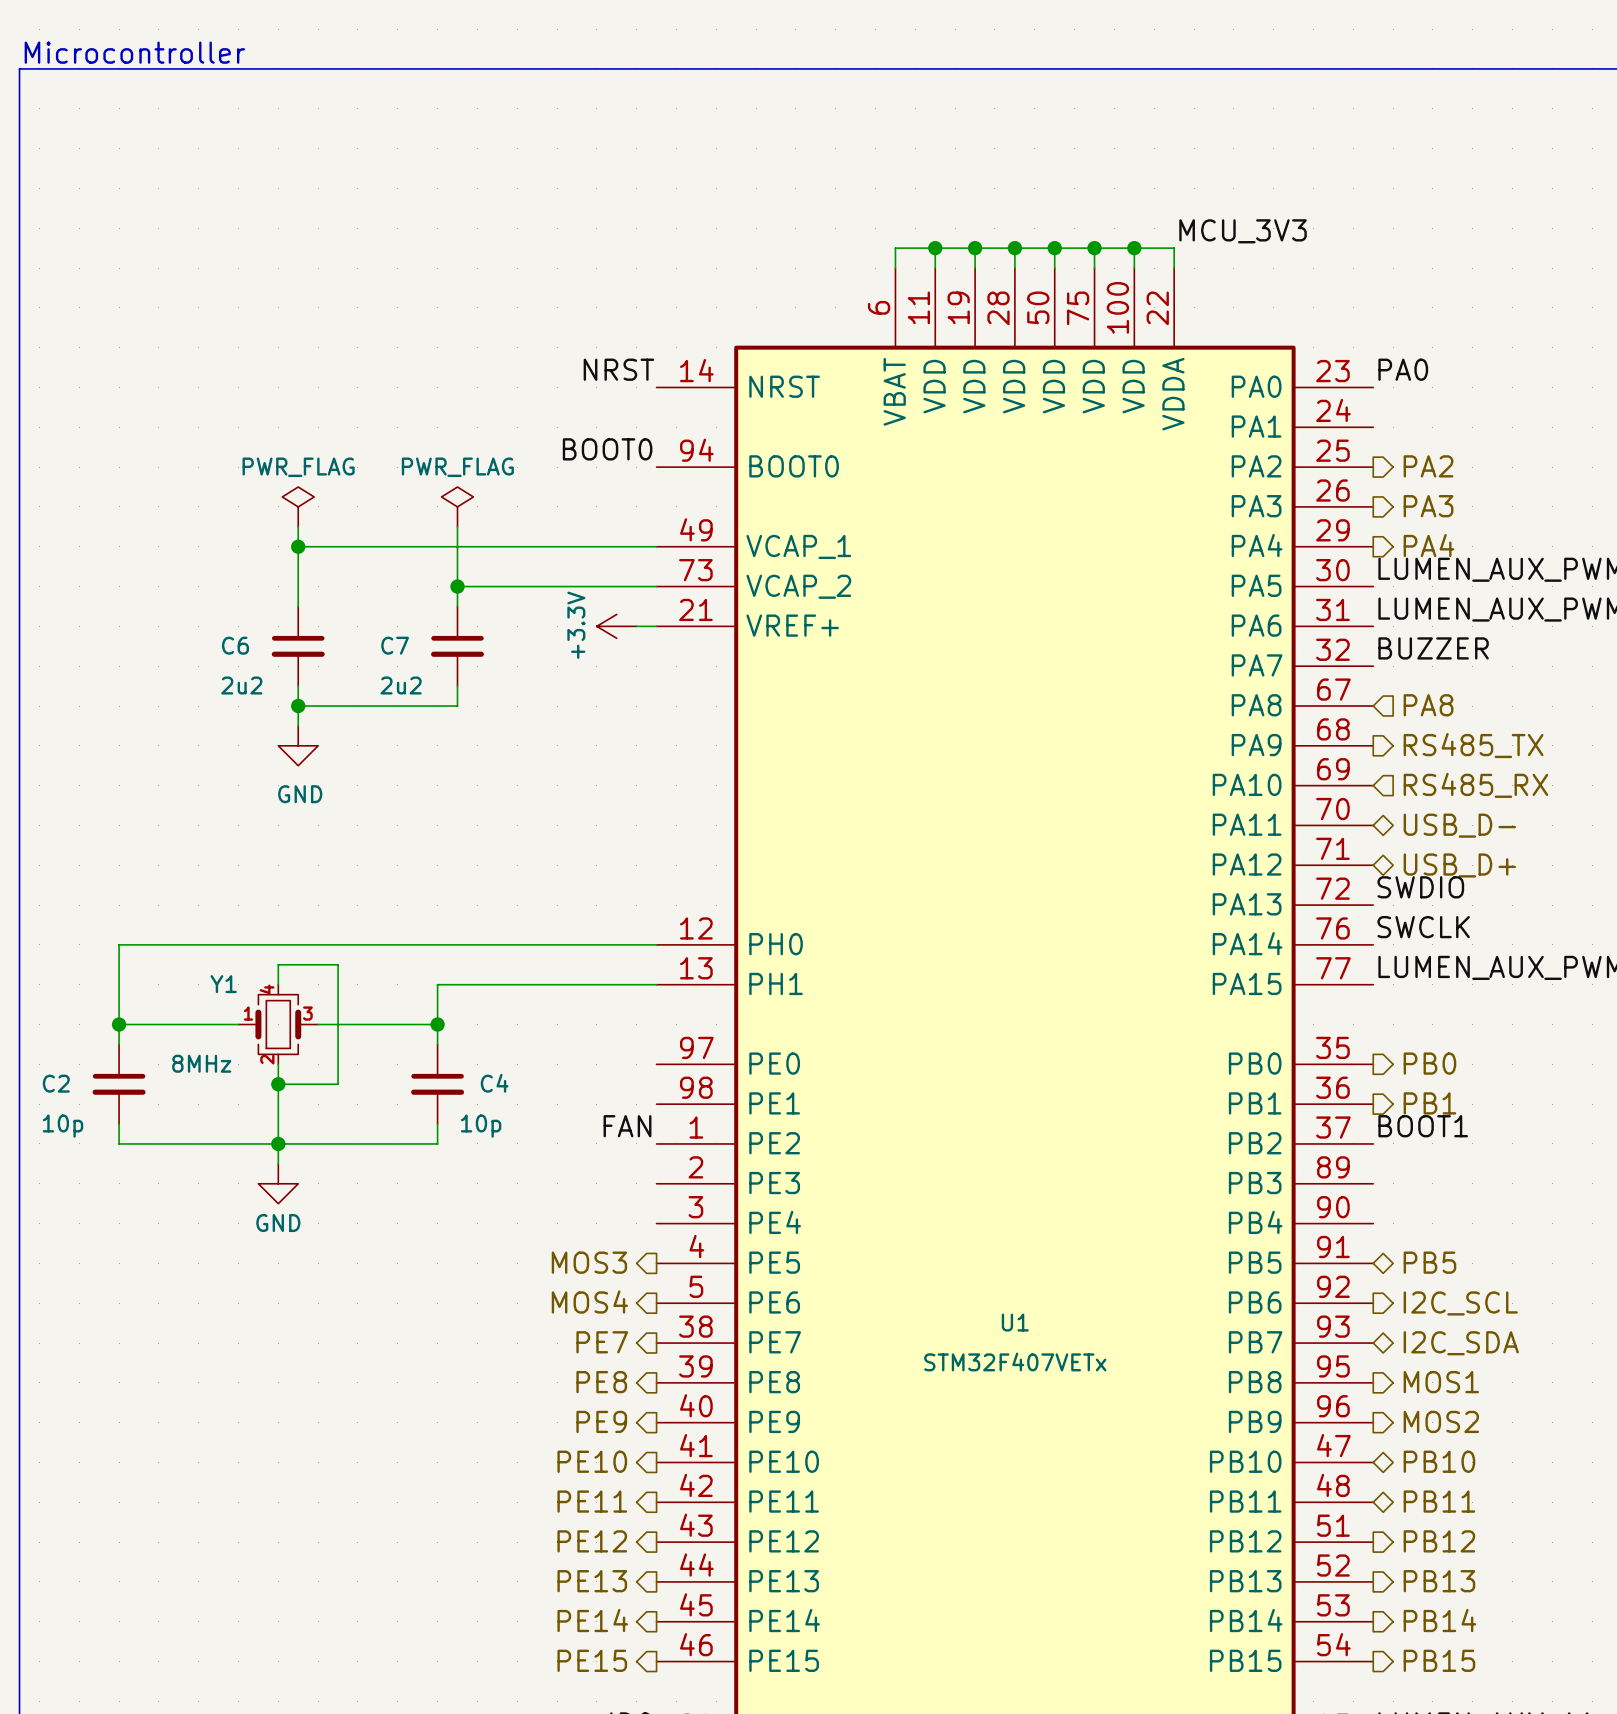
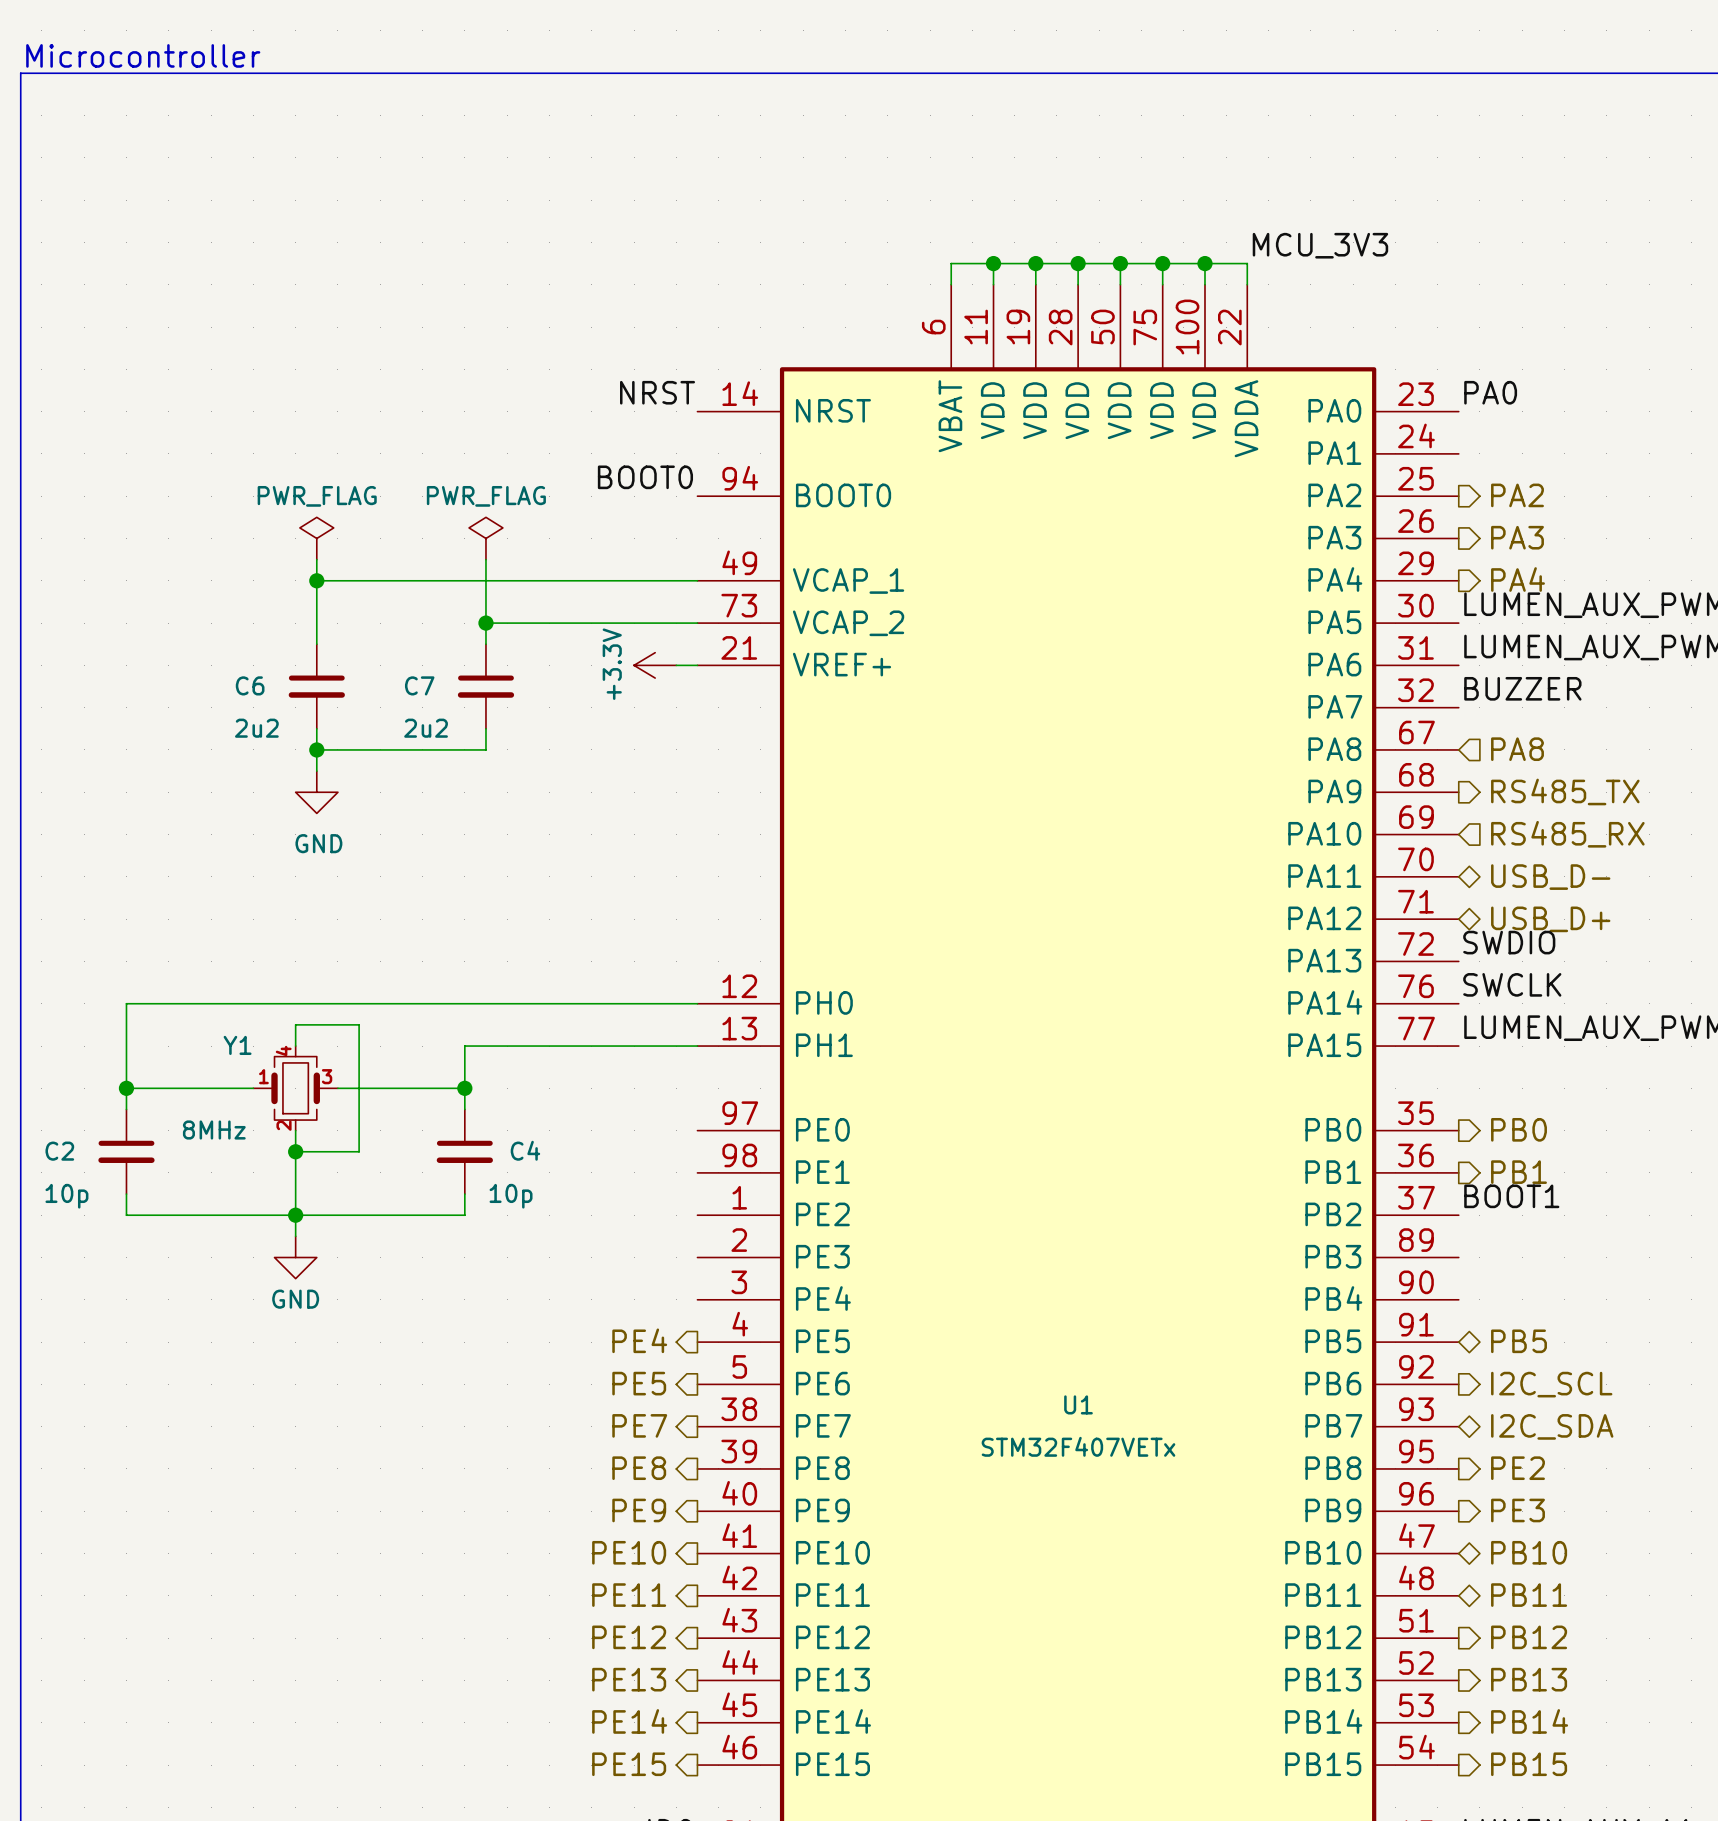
label: FAN (627, 1126) -> none
hierarchical label: MOS3 (589, 1262) -> PE4 (639, 1340)
hierarchical label: MOS4 (589, 1302) -> PE5 (639, 1383)
hierarchical label: MOS1 (1441, 1382) -> PE2 (1518, 1468)
hierarchical label: MOS2 (1441, 1421) -> PE3 (1518, 1510)

